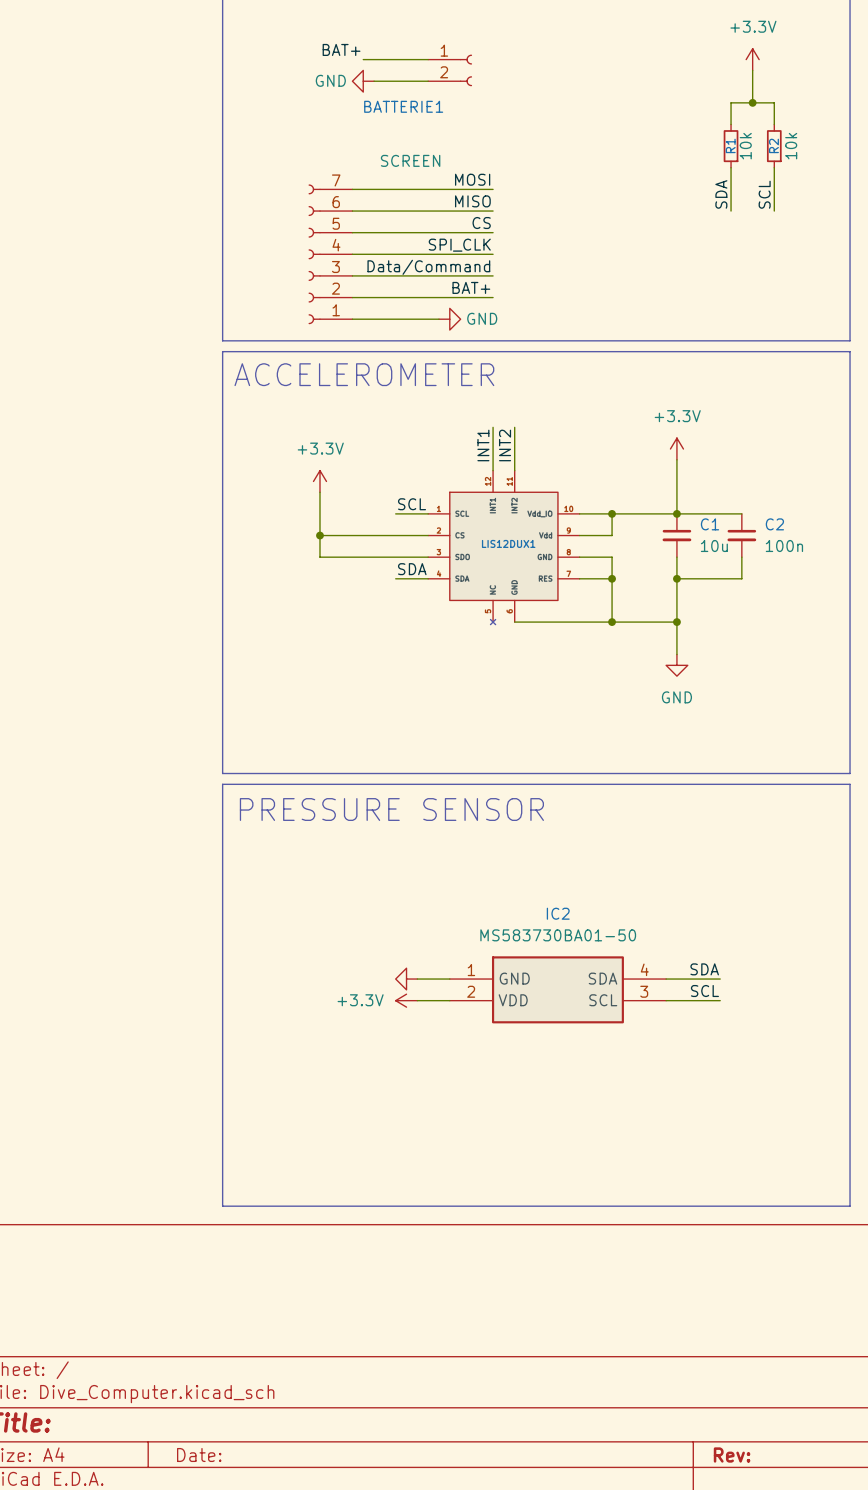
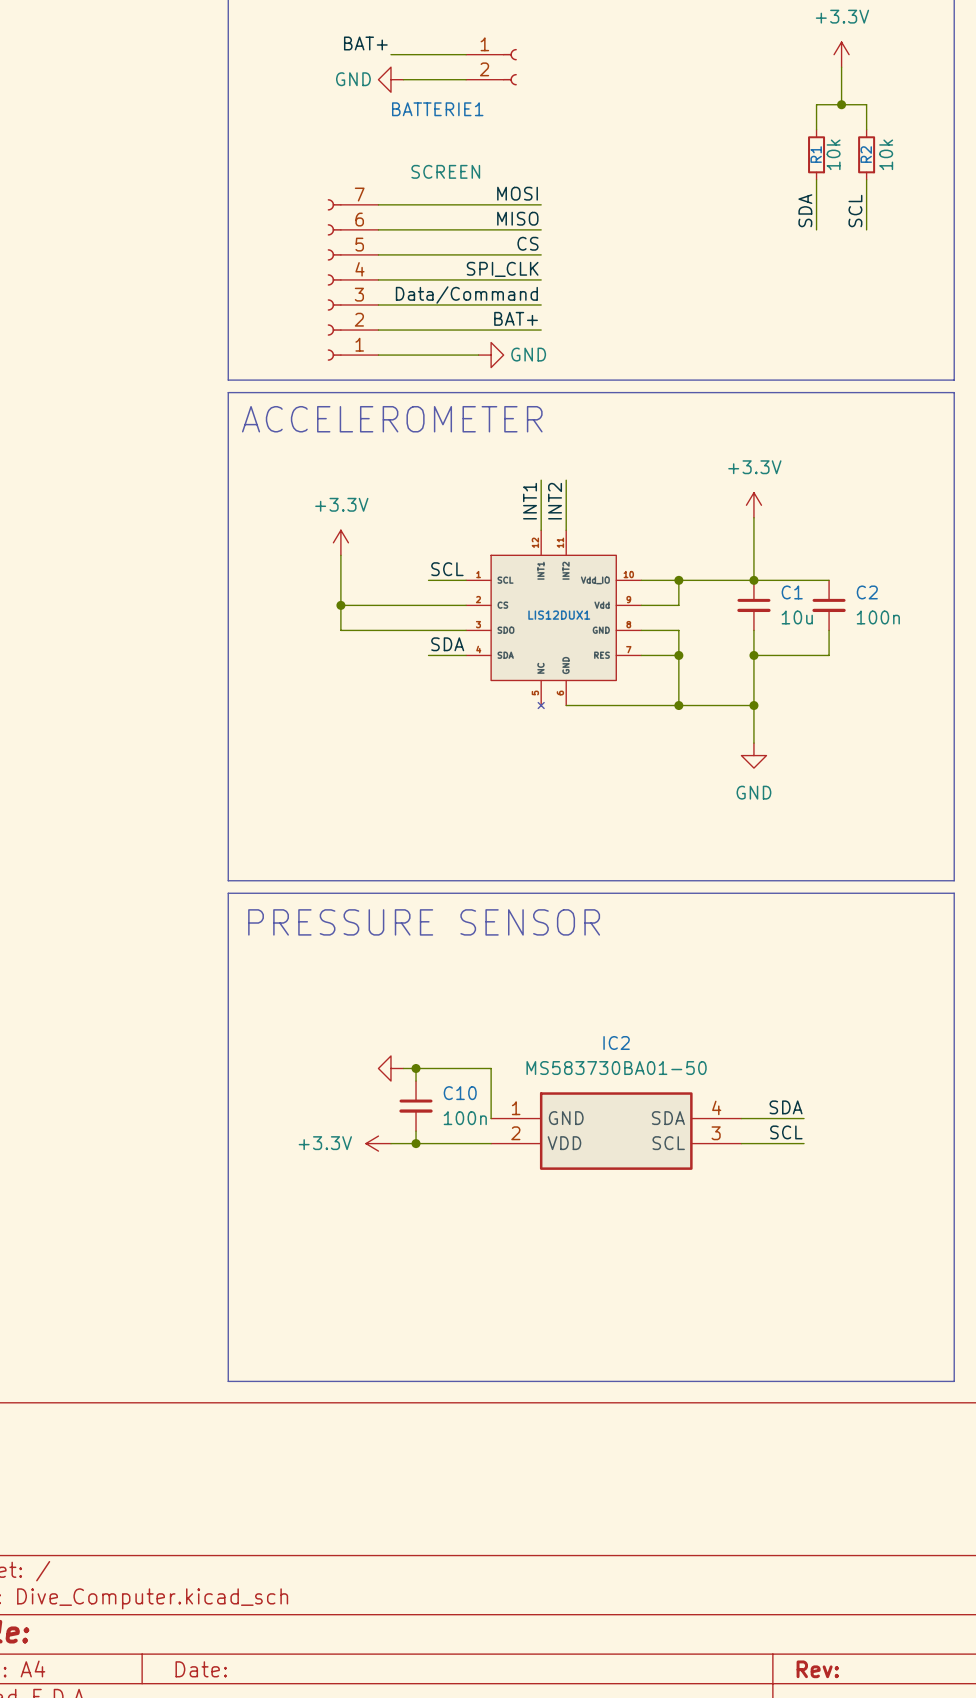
wire: none -> (416, 1068) (416, 1081)
junction: none -> (416, 1068)
C10: none -> 100n (416, 1106)
power symbol position: (406, 979) -> (390, 1068)
wire: (417, 979) (449, 979) -> (403, 1068) (491, 1068) (491, 1118)
wire: none -> (416, 1131) (416, 1143)
wire: none -> (390, 1143) (453, 1143)
junction: none -> (416, 1143)
power symbol position: +3.3V (406, 1000) -> +3.3V (378, 1143)

